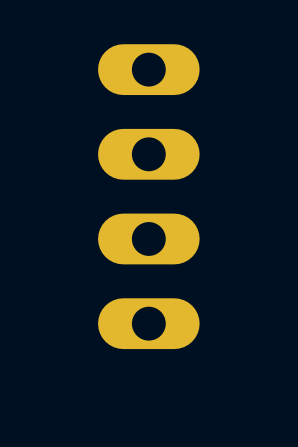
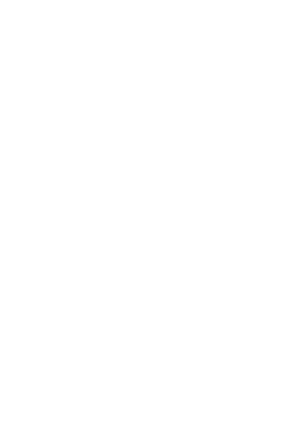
part: (148, 196) -> none

